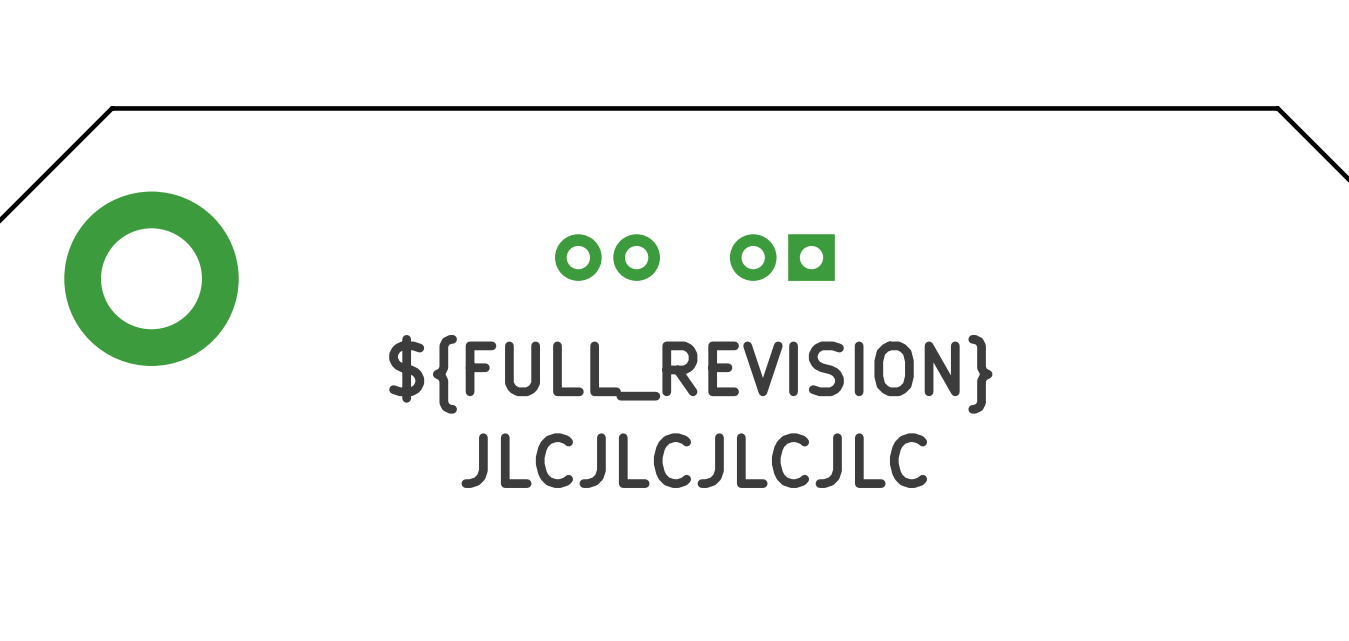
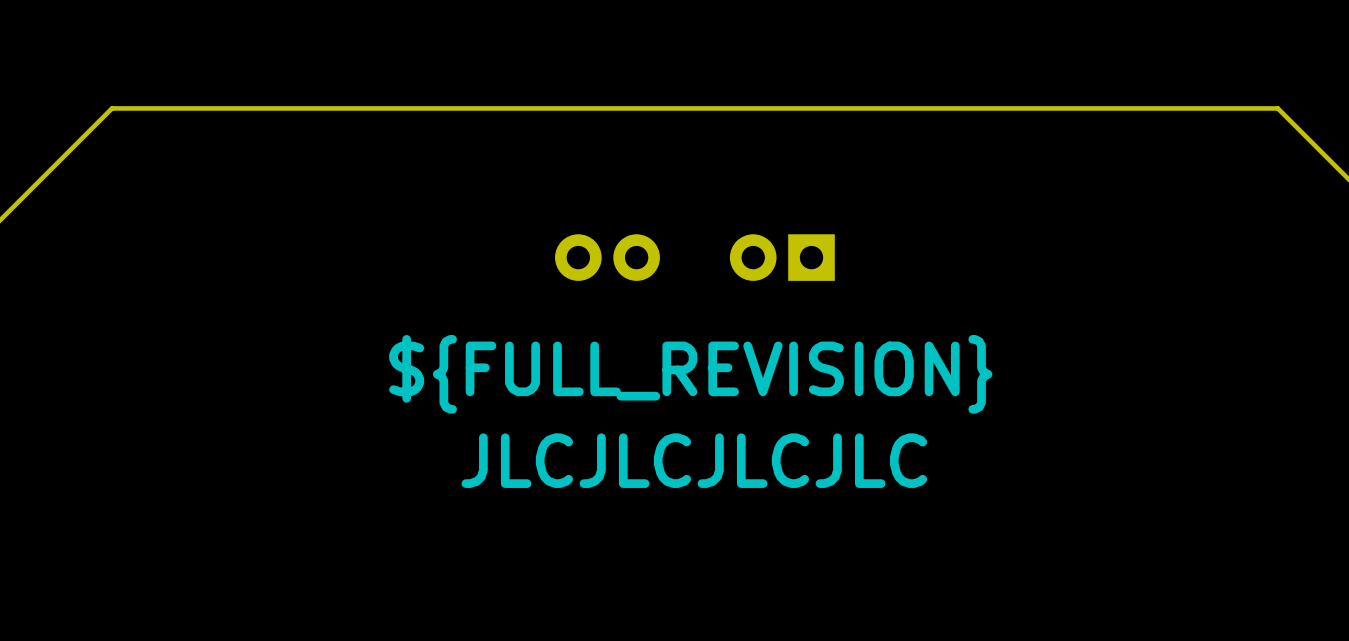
part: (151, 278) -> none

